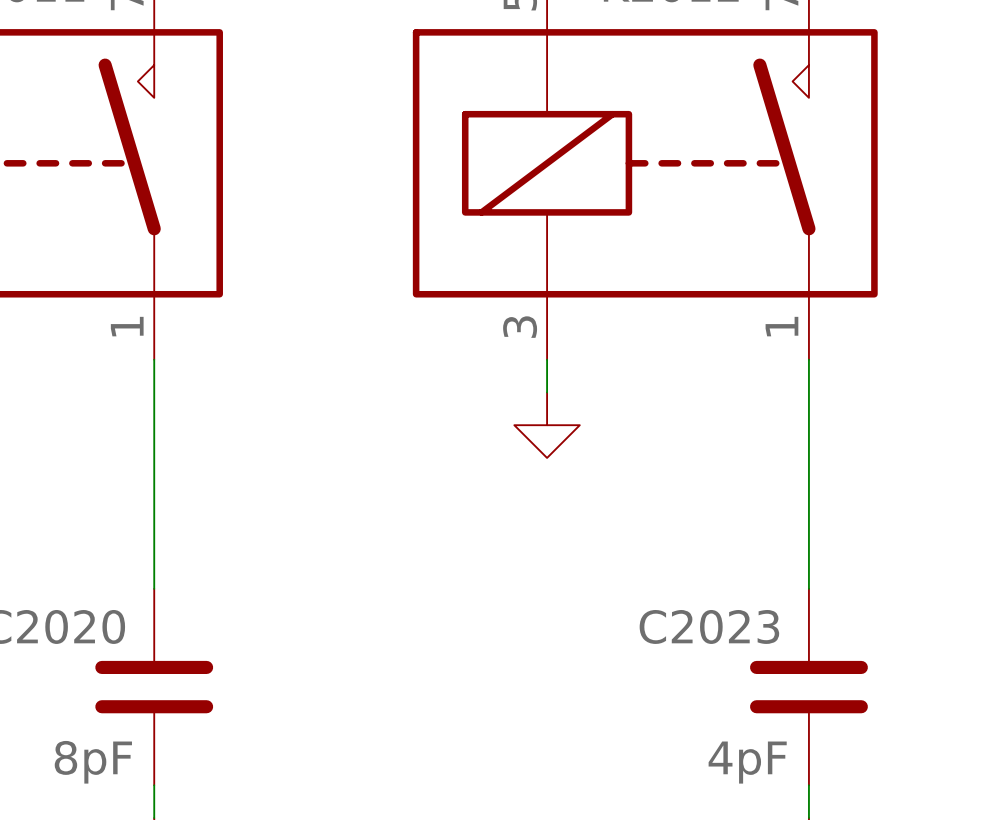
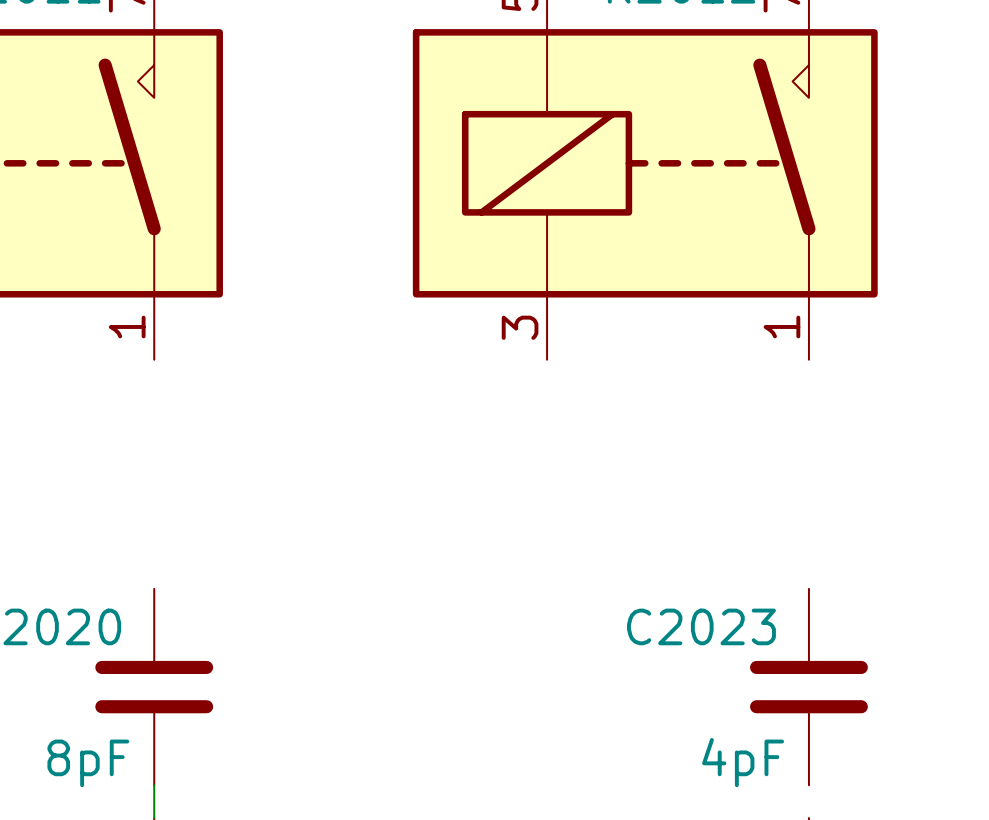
wire: (154, 359) (154, 588) -> none
wire: (547, 359) (547, 392) -> none
wire: (808, 359) (808, 588) -> none
power symbol: (547, 425) -> none
wire: (808, 785) (808, 818) -> none

